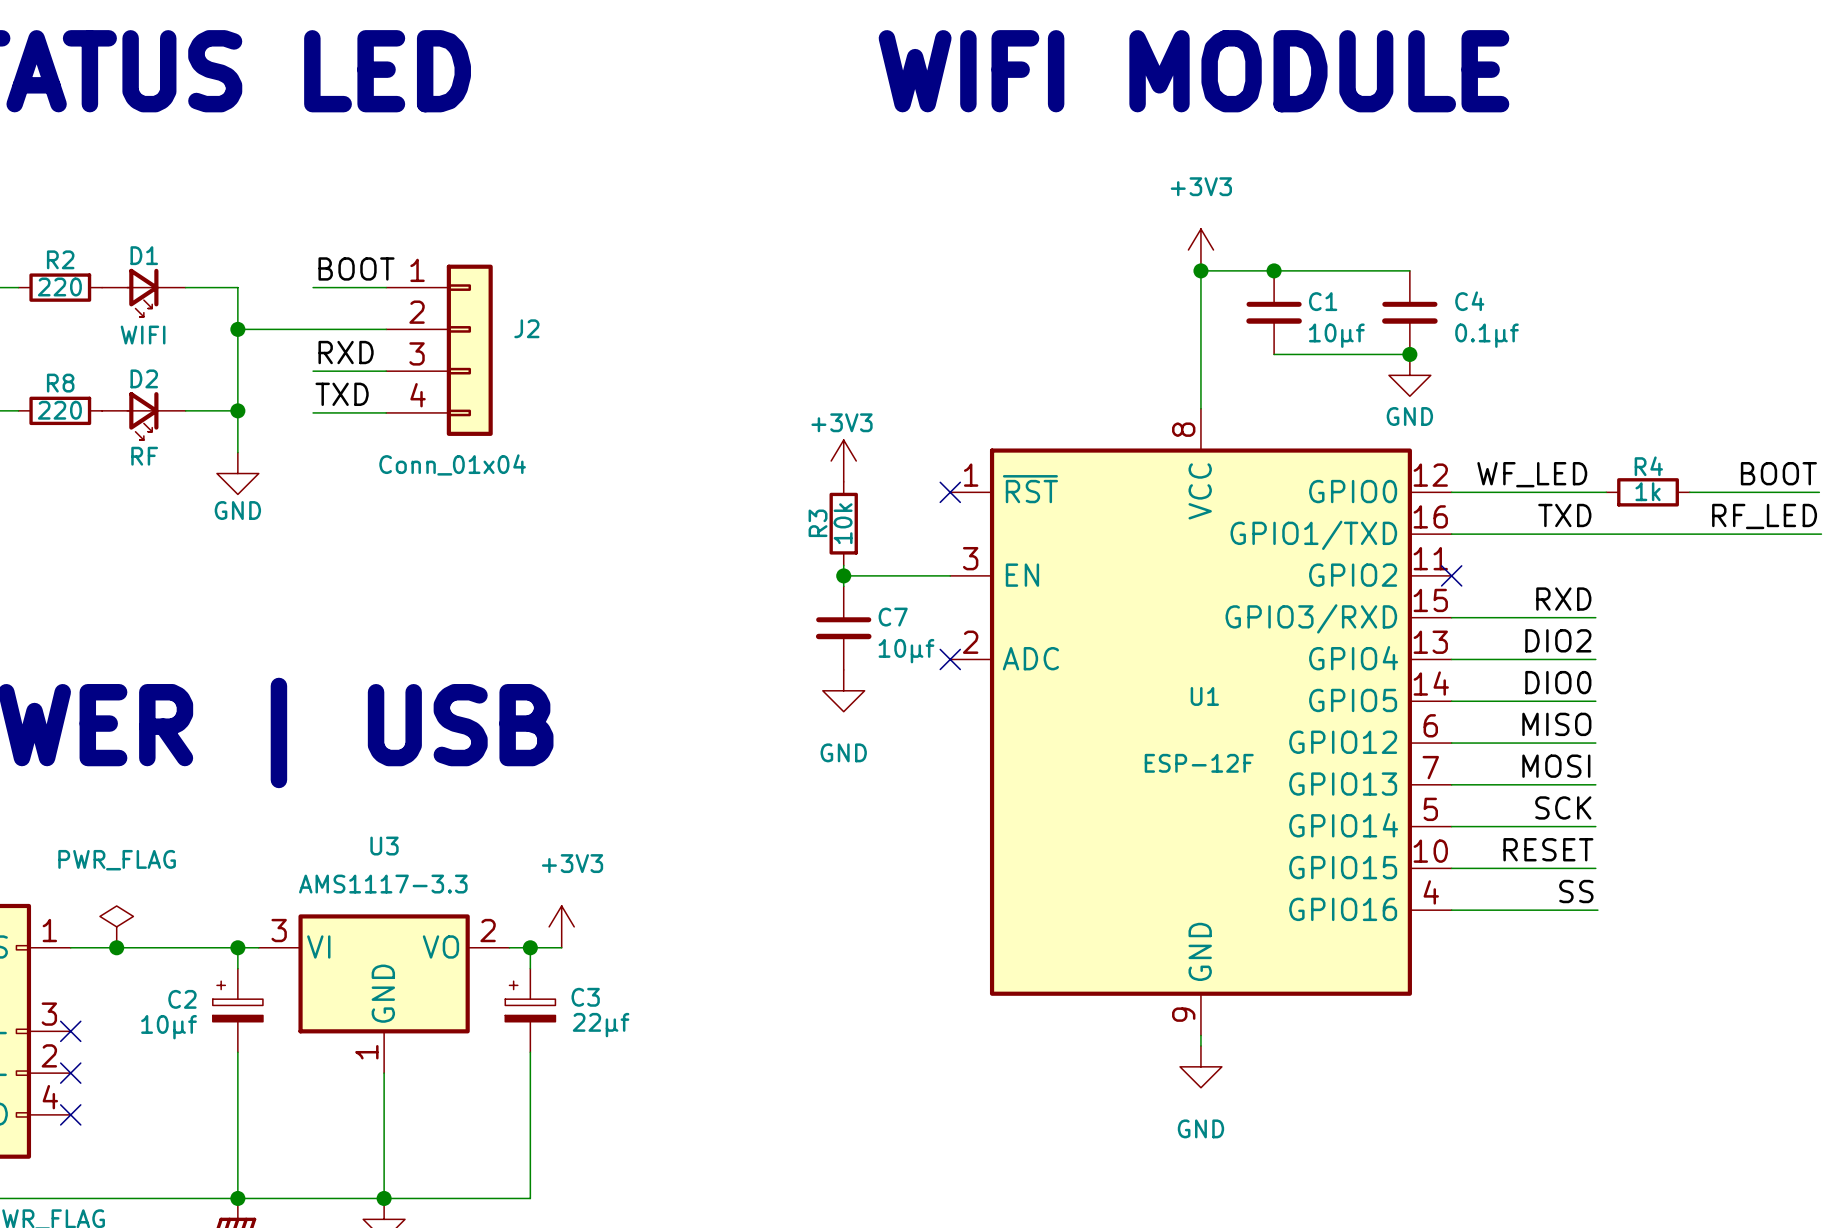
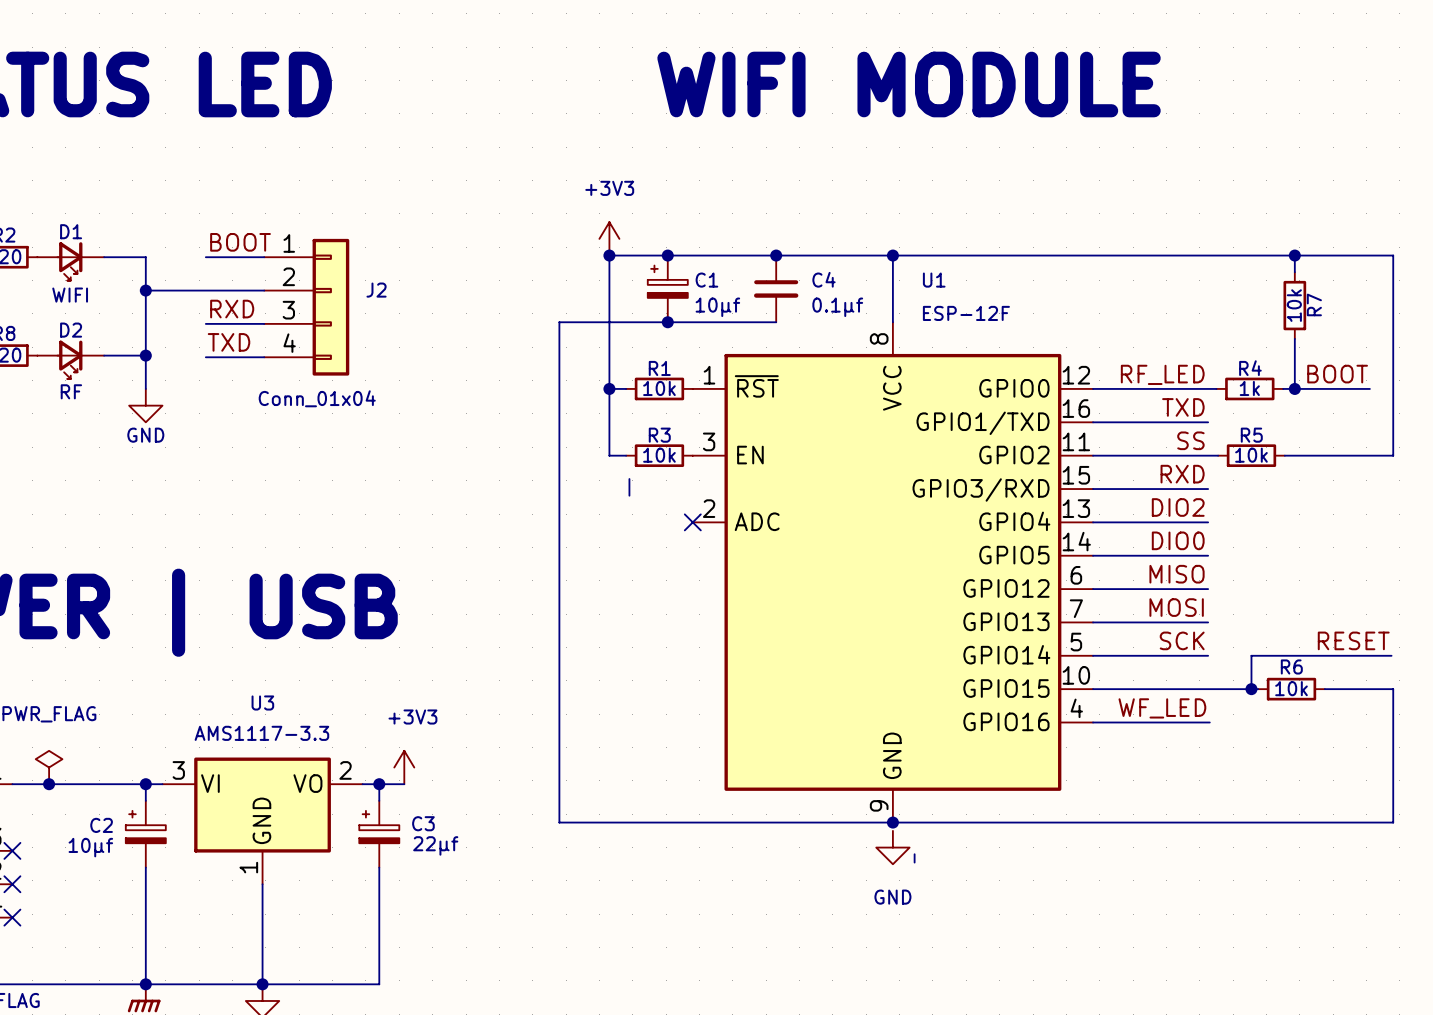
power symbol: +3V3 (1200, 249) -> none
power symbol: none -> +3V3 (609, 238)
junction position: (1200, 270) -> (892, 255)
C1 symbol: [1246, 270, 1302, 355] -> [647, 255, 688, 323]
junction: (1274, 270) -> none
wire: (1409, 270) (1200, 270) (1200, 408) -> none
junction: none -> (609, 255)
junction: none -> (667, 255)
junction: none -> (776, 255)
wire: none -> (892, 255) (892, 322)
wire: none -> (1294, 255) (1294, 272)
junction: none -> (1294, 255)
C4 position: (1409, 312) -> (776, 288)
R7: none -> 10k (1294, 305)
wire: (1274, 354) (1409, 354) -> none
junction: (1409, 354) -> none
junction: none -> (667, 322)
wire: none -> (776, 322) (559, 322) (559, 822) (1393, 822) (1393, 689) (1324, 689)
power symbol: GND (1409, 375) -> none
wire: none -> (1294, 338) (1294, 388)
wire: none -> (609, 388) (626, 388)
junction: none -> (609, 388)
R1: none -> 10k (659, 388)
wire: none -> (1283, 388) (1369, 388)
junction: none -> (1294, 388)
power symbol: +3V3 (843, 461) -> none
label position: BOOT (1778, 473) -> BOOT (1337, 374)
label position: WF_LED (1532, 474) -> WF_LED (1162, 708)
no-connect mark: (950, 492) -> none
wire: (1451, 492) (1606, 492) -> (1093, 388) (1216, 388)
R4 position: (1648, 492) -> (1249, 388)
wire: (1689, 492) (1819, 492) -> none
label position: TXD (1564, 515) -> TXD (1183, 407)
label position: RF_LED (1764, 516) -> RF_LED (1162, 374)
R3 rotation: 0° (843, 523) -> 90° clockwise (659, 455)
wire: (1451, 534) (1821, 534) -> none
wire: none -> (626, 455) (609, 455) (609, 255) (1393, 255) (1393, 455) (1284, 455)
wire: none -> (1093, 455) (1218, 455)
R5: none -> 10k (1251, 455)
wire: (843, 575) (950, 575) -> none
junction: (843, 575) -> none
no-connect mark: (1451, 575) -> none
label position: RXD (1563, 599) -> RXD (1182, 474)
wire: (1451, 617) (1595, 617) -> (1093, 489) (1208, 489)
C7: 10µf (843, 628) -> none
label position: DIO2 (1558, 640) -> DIO2 (1178, 507)
no-connect mark position: (950, 659) -> (692, 522)
wire: (1451, 659) (1595, 659) -> (1093, 522) (1208, 522)
label position: DIO0 (1558, 682) -> DIO0 (1178, 540)
power symbol: GND (843, 690) -> none
U1 name position: U1 (1204, 696) -> U1 (934, 280)
wire: (1451, 701) (1595, 701) -> (1093, 555) (1208, 555)
U1 position: (1200, 722) -> (892, 572)
label position: MISO (1556, 724) -> MISO (1177, 574)
wire: (1451, 743) (1595, 743) -> (1093, 589) (1208, 589)
U1 value position: ESP-12F (1199, 763) -> ESP-12F (966, 313)
label position: MOSI (1556, 766) -> MOSI (1176, 607)
wire: (1451, 784) (1595, 784) -> (1093, 622) (1208, 622)
wire: none -> (1391, 655) (1251, 655) (1251, 689)
label position: SCK (1563, 807) -> SCK (1182, 640)
wire: (1451, 826) (1595, 826) -> (1093, 655) (1208, 655)
wire: none -> (1093, 689) (1258, 689)
junction: none -> (1251, 689)
R6: none -> 10k (1291, 689)
label position: RESET (1548, 849) -> RESET (1353, 640)
wire: (1451, 868) (1595, 868) -> (1093, 422) (1208, 422)
label position: SS (1576, 891) -> SS (1190, 440)
wire: (1451, 910) (1597, 910) -> (1093, 722) (1209, 722)
junction: none -> (892, 822)
power symbol position: GND (1200, 1066) -> GND (892, 847)

